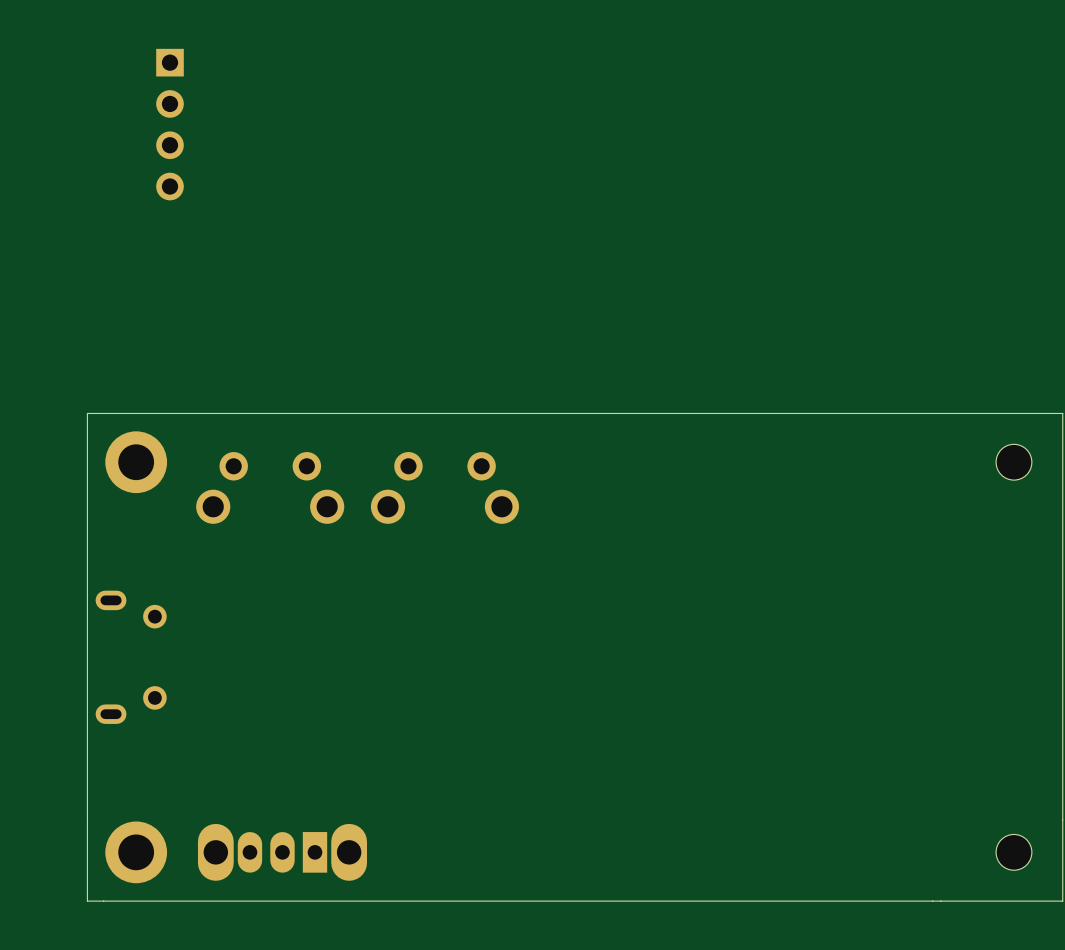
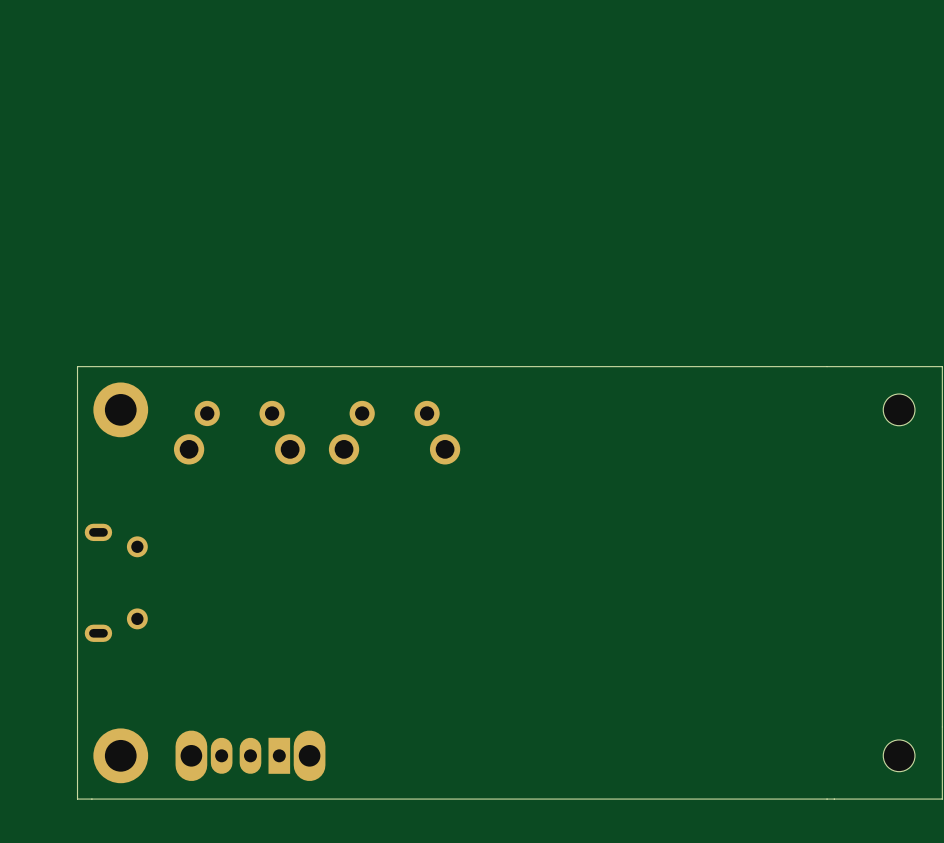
part: (169, 124) -> none

